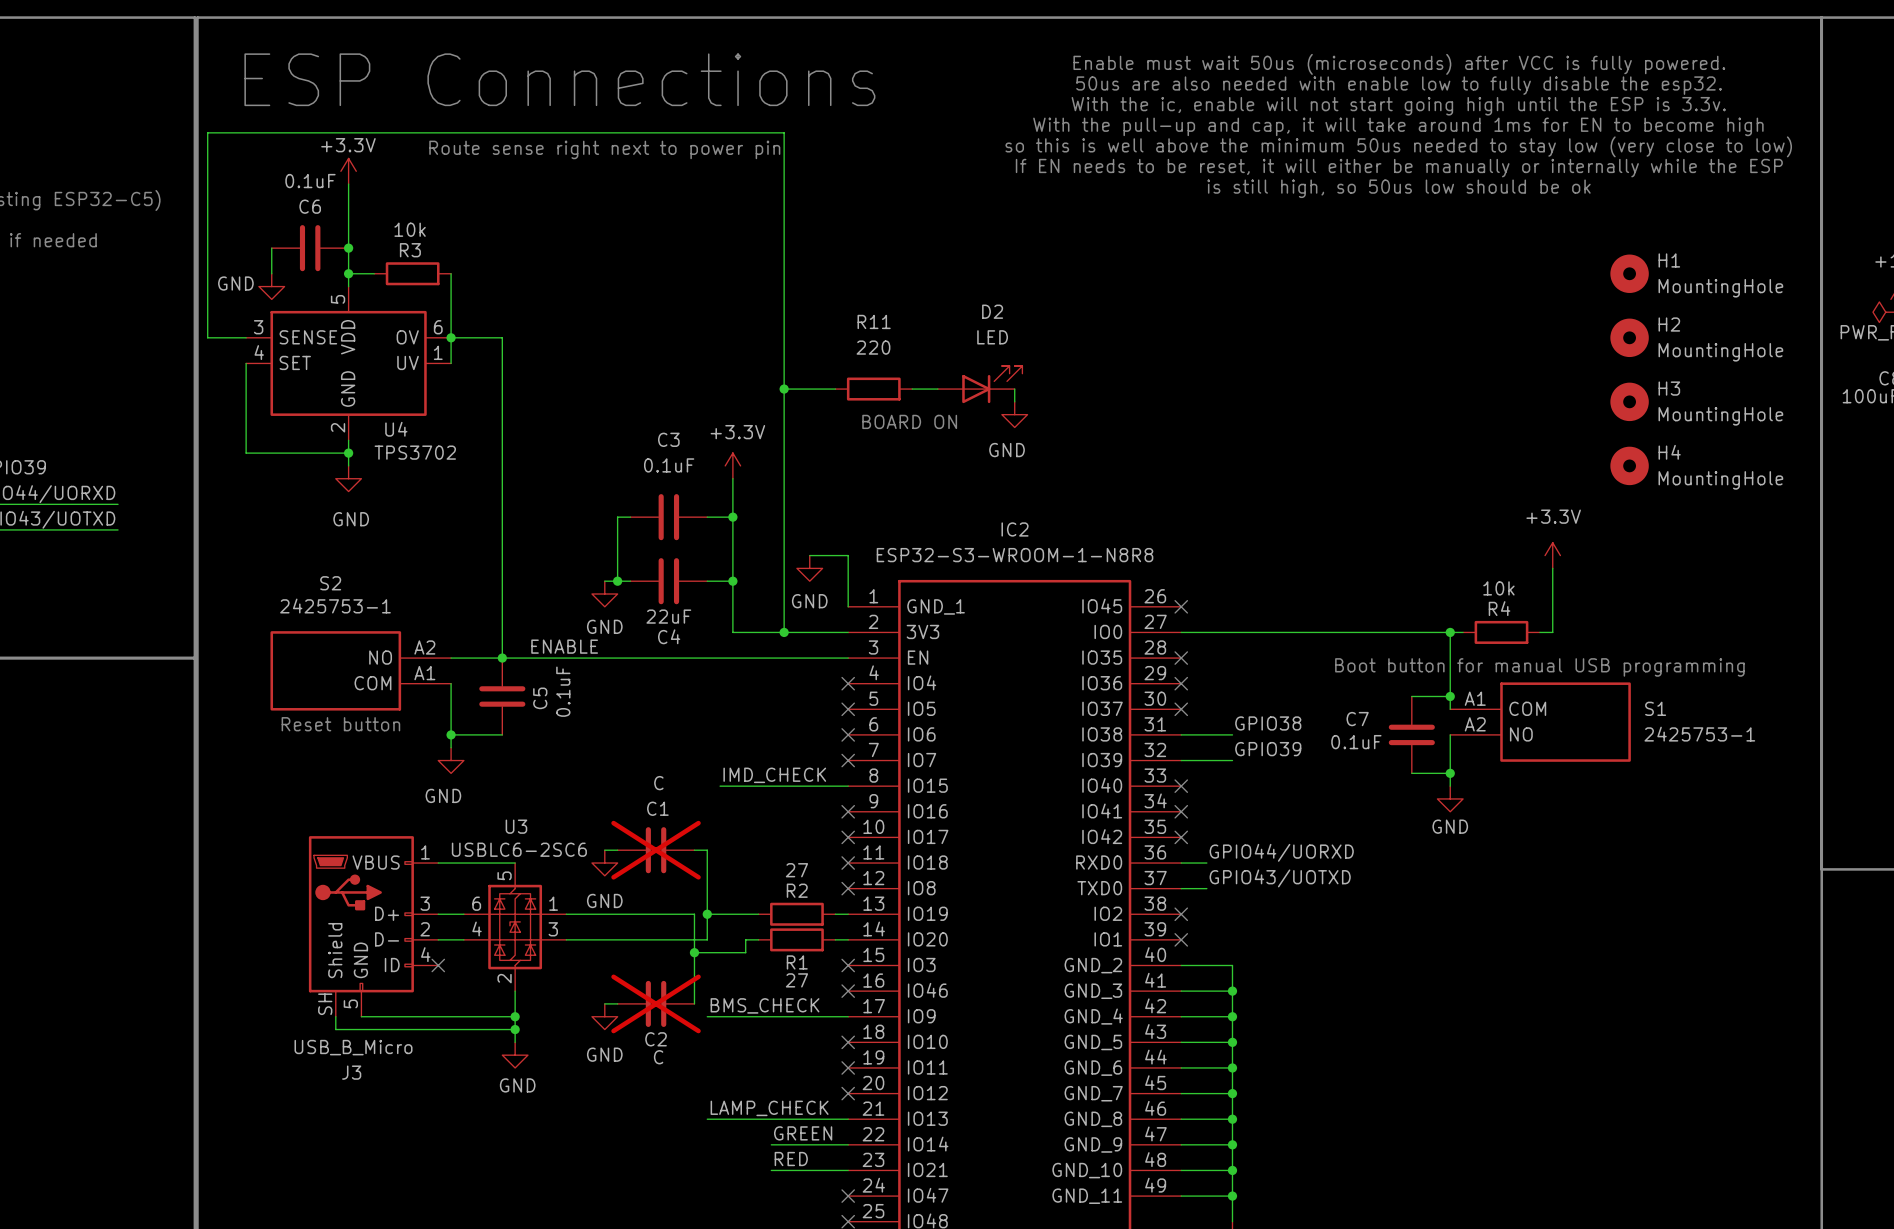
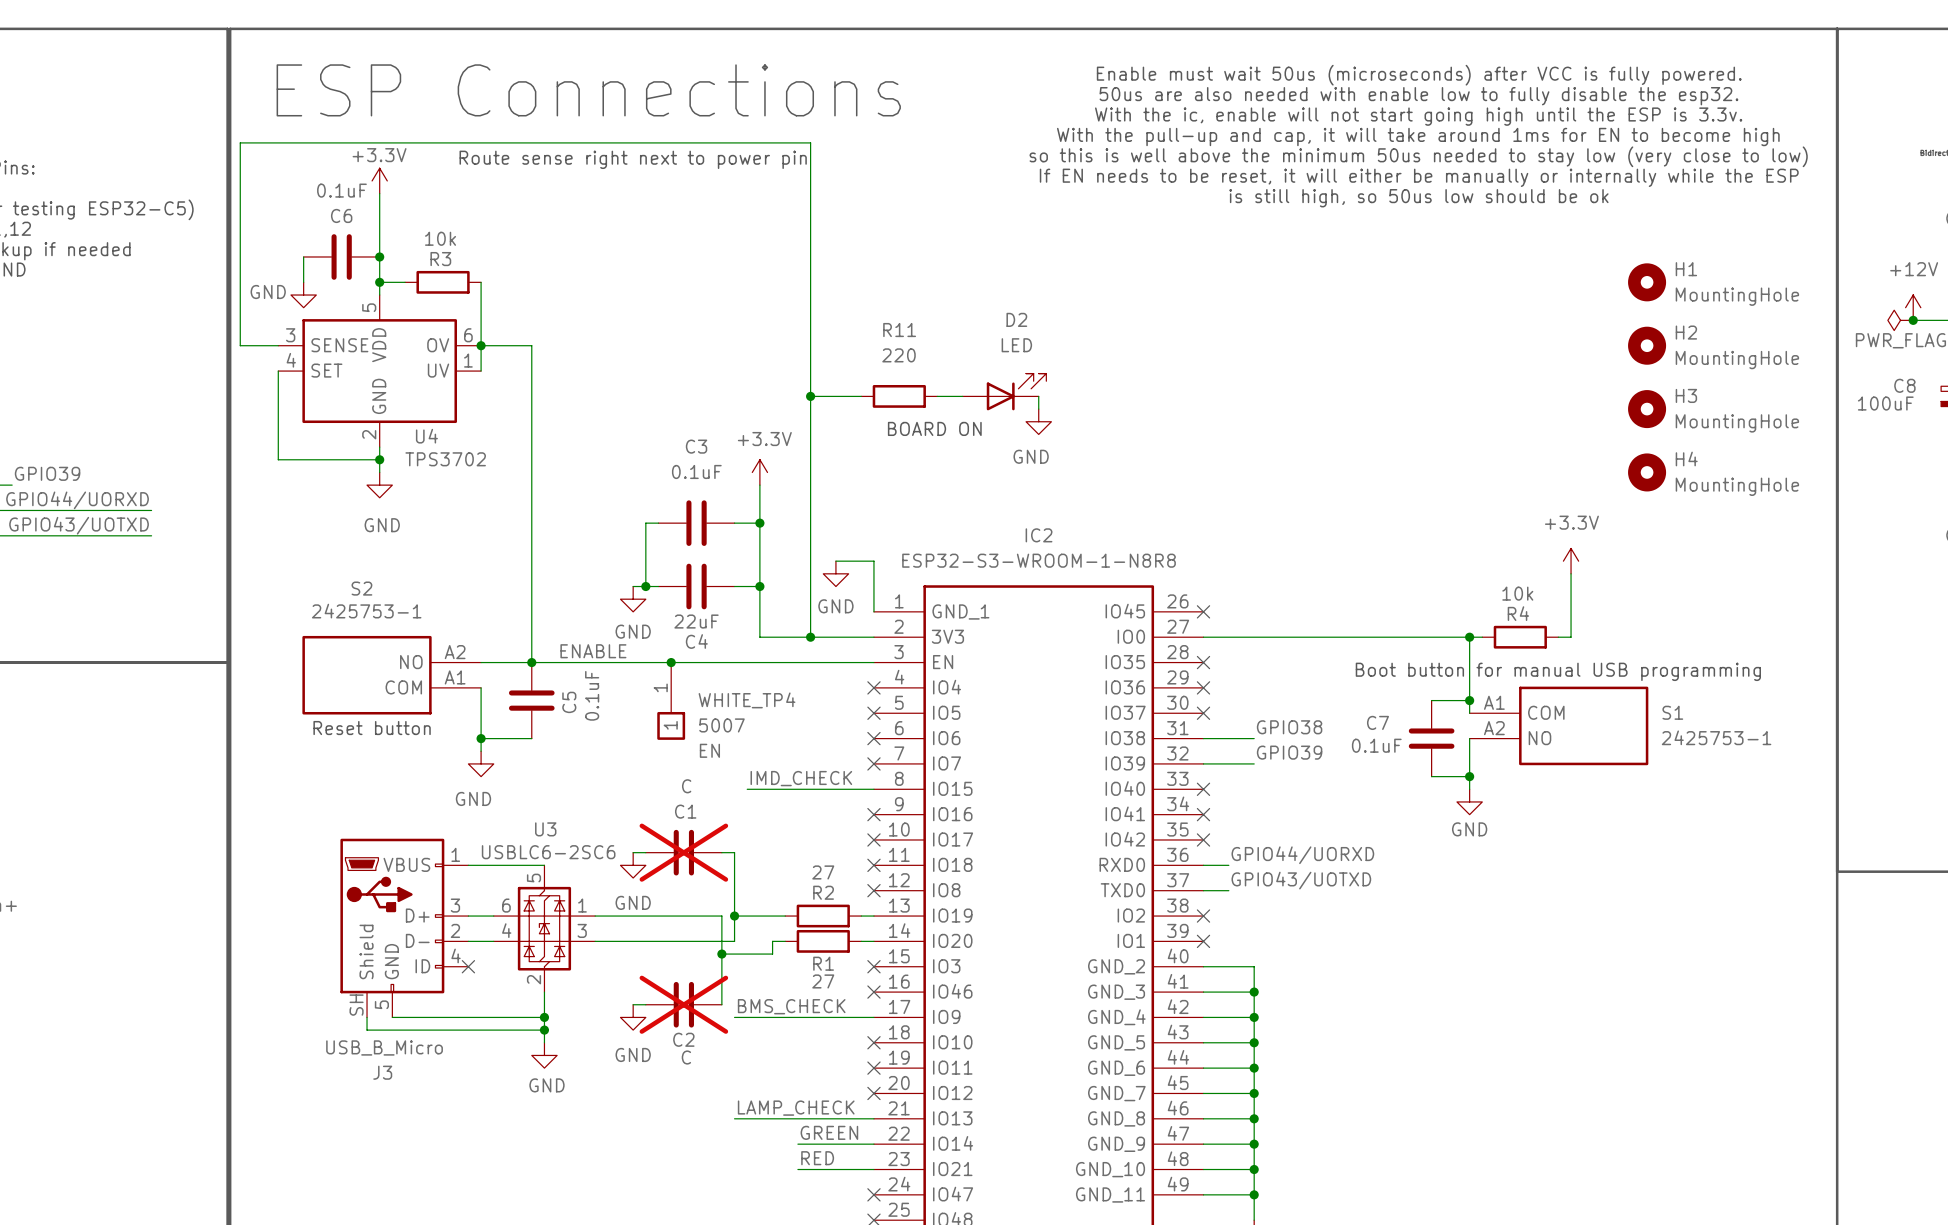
junction: none -> (671, 662)
WHITE_TP4: none -> 5007 (671, 701)

